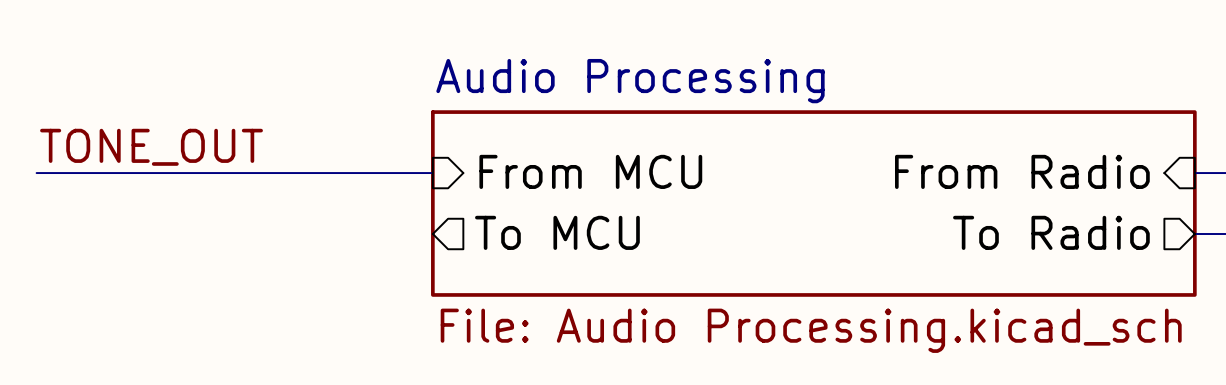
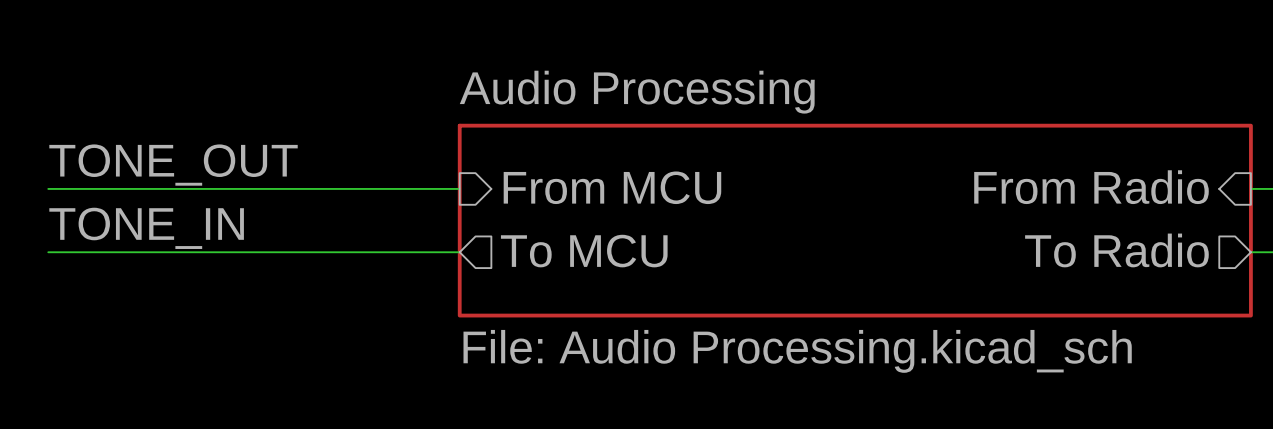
label: none -> TONE_IN (146, 228)
wire: none -> (48, 252) (459, 252)

